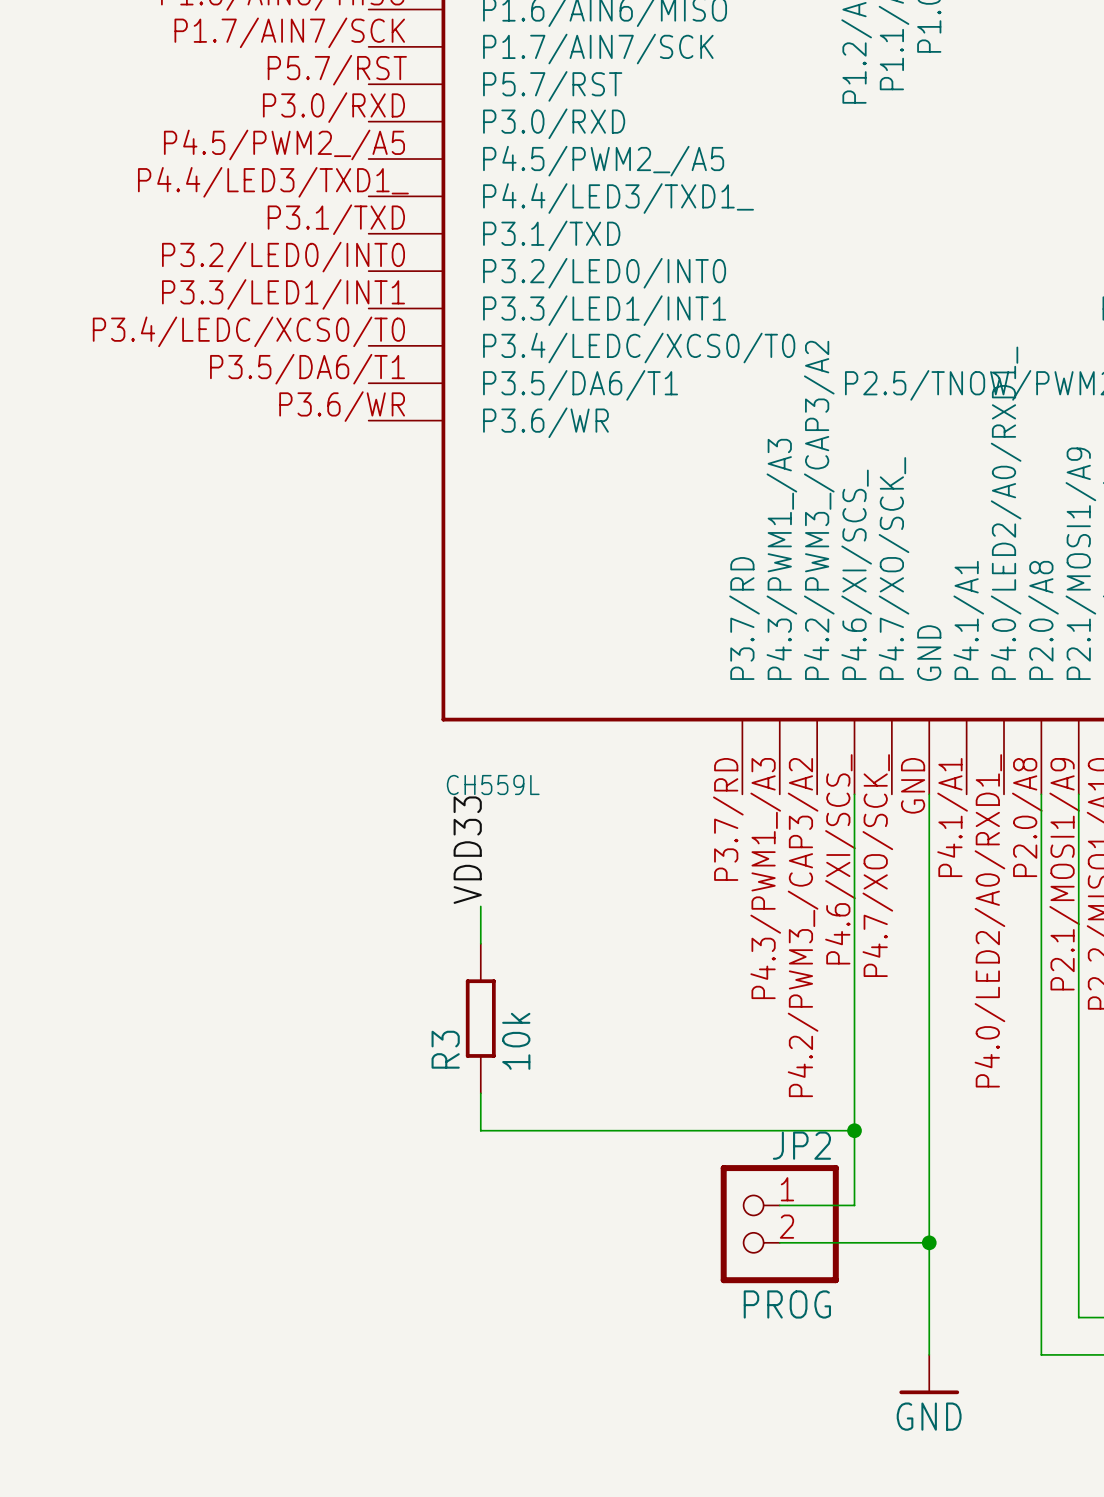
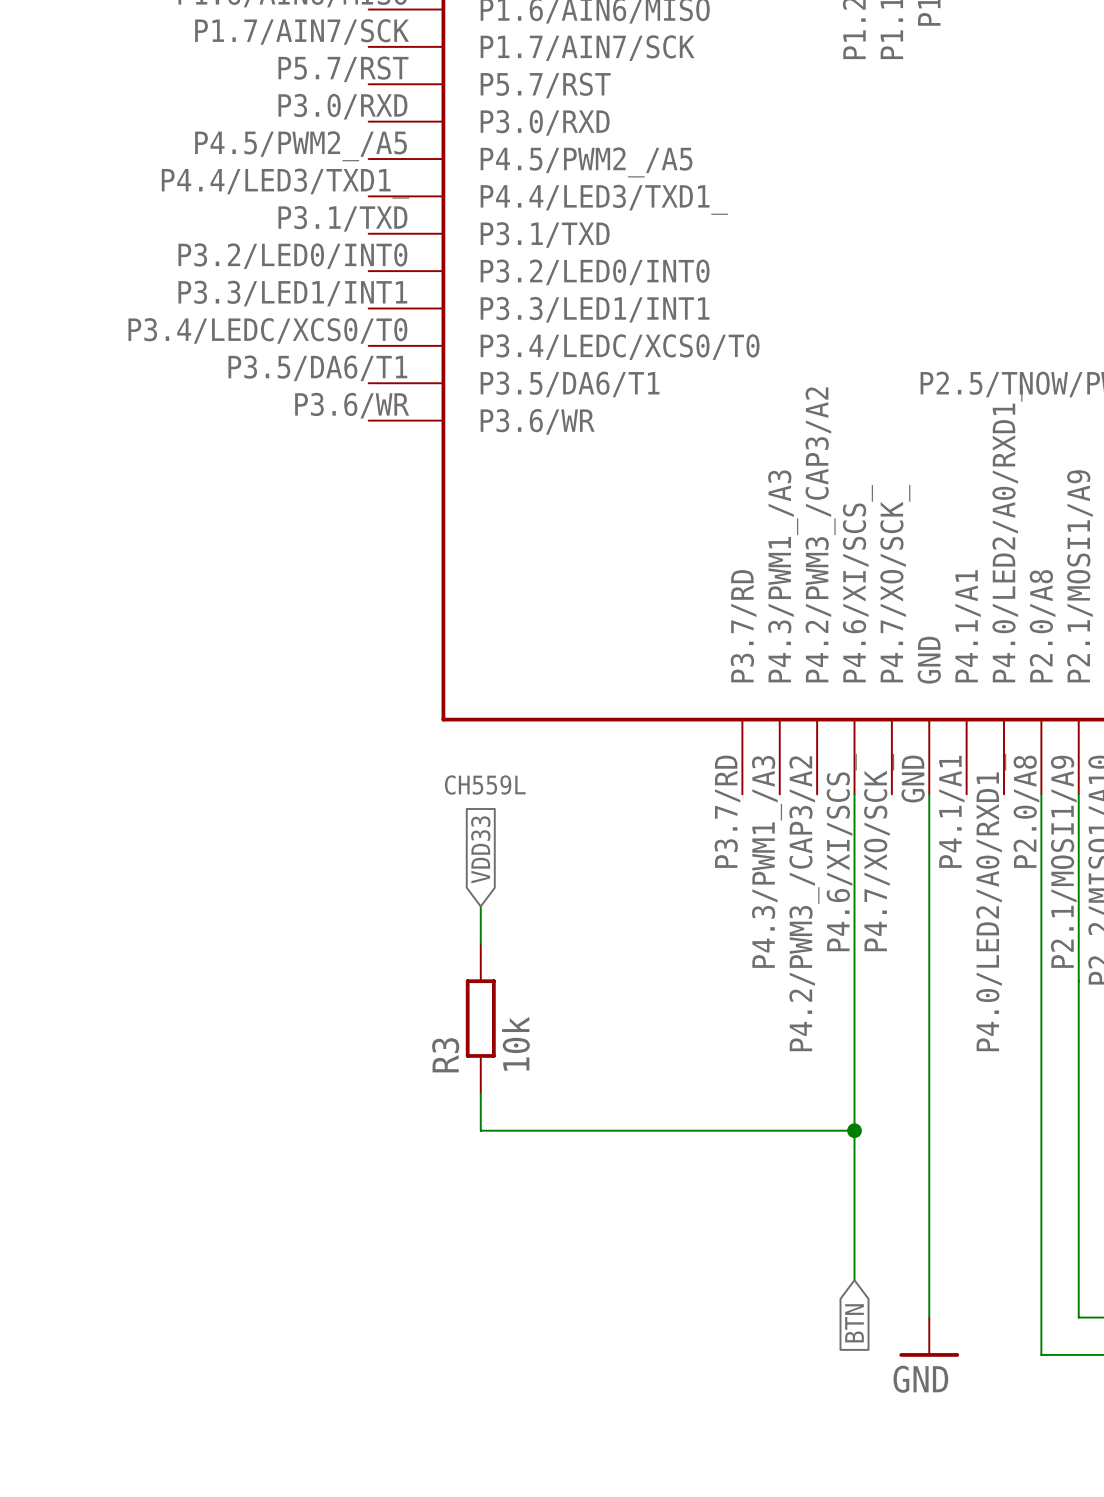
global label: none -> VDD33 (480, 849)
label: VDD33 (467, 850) -> none
wire: (779, 1205) (854, 1205) -> (854, 1280) (854, 1205)
JP2: PROG (779, 1224) -> none
wire: (779, 1242) (929, 1242) -> none
junction: (929, 1242) -> none
global label: none -> BTN (854, 1323)
power symbol position: GND (929, 1374) -> GND (929, 1337)

